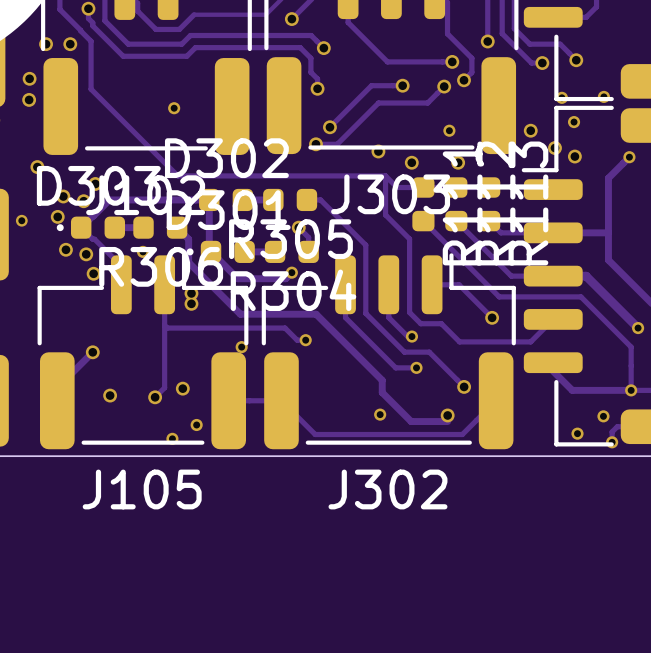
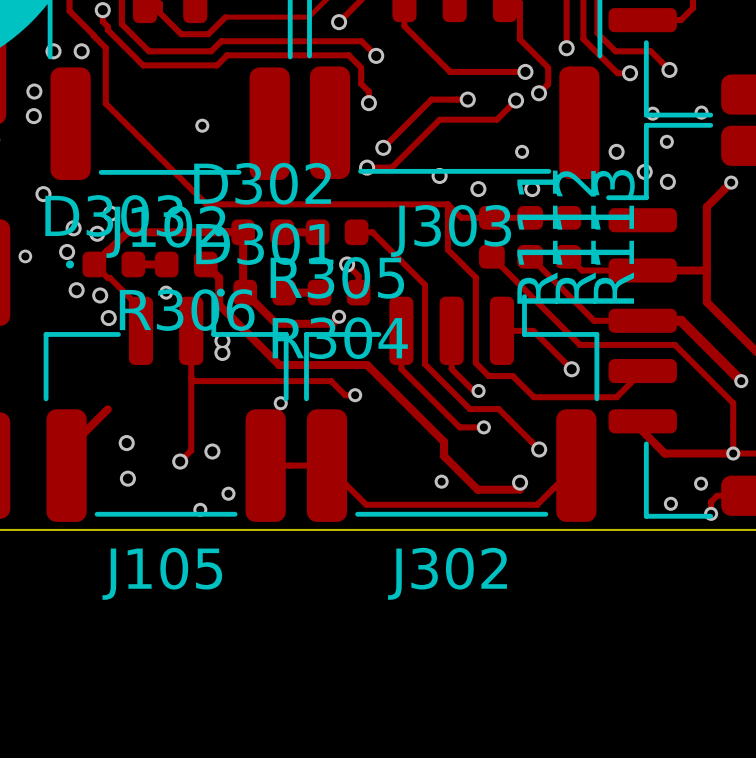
via: (92, 352) -> none
via: none -> (126, 443)
via: (110, 395) -> none
via: none -> (127, 478)

